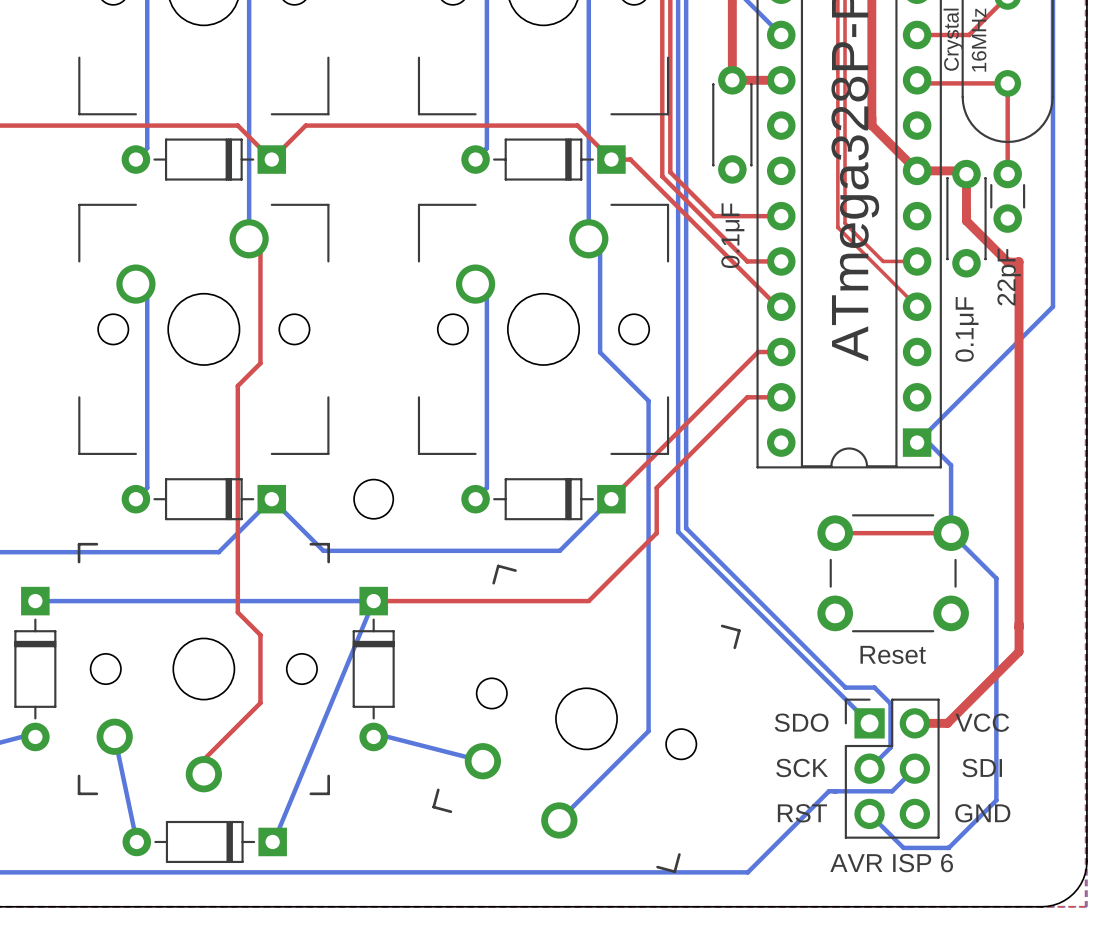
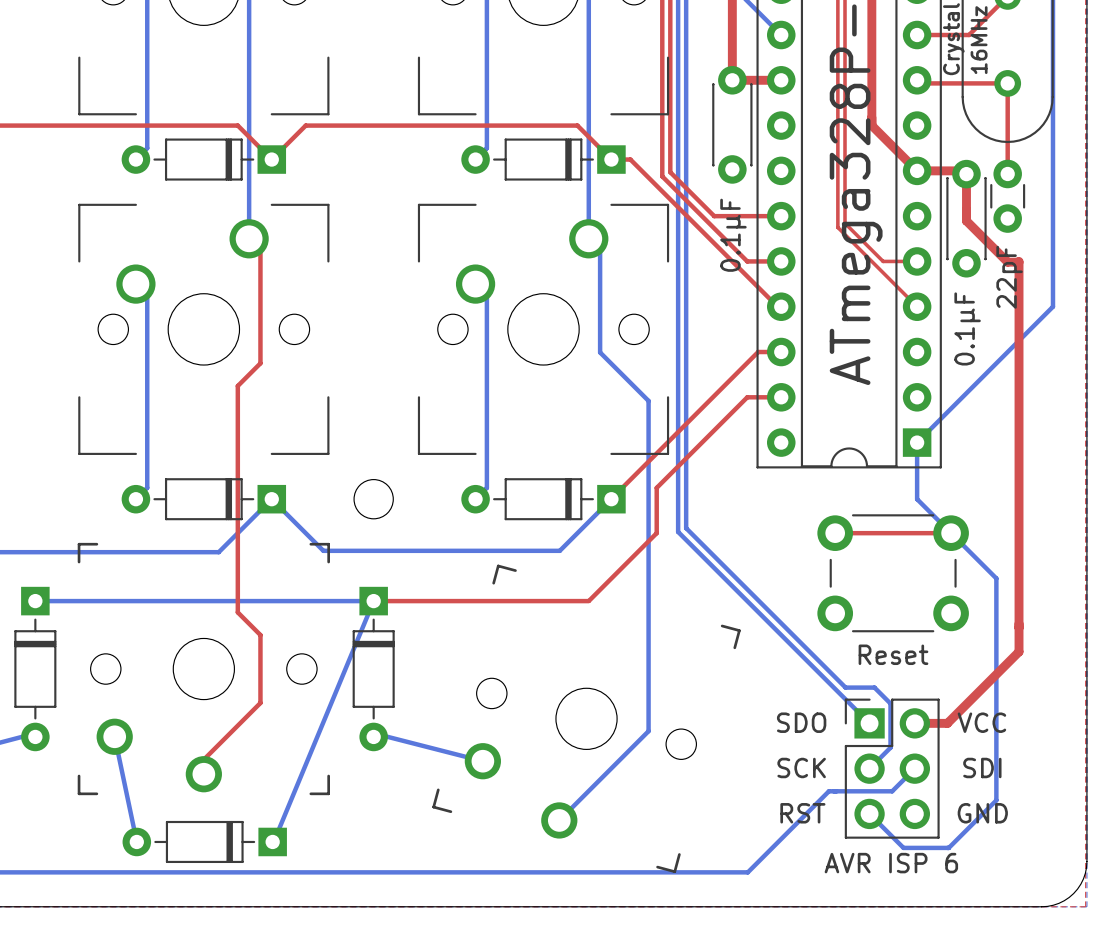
bottom track: (917, 442) (928, 442) (951, 465) (951, 533) -> (917, 442) (917, 499) (951, 533)

